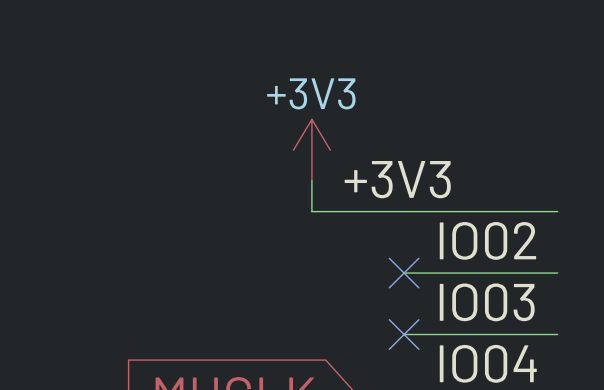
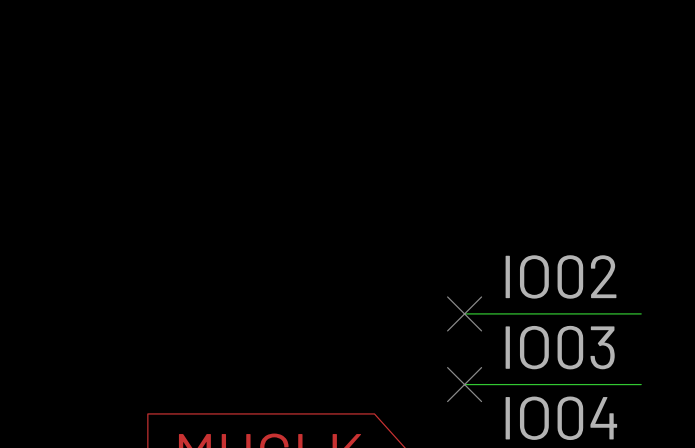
power symbol: +3V3 (311, 150) -> none
label: +3V3 (397, 179) -> none
wire: (311, 180) (311, 211) (557, 211) -> none

